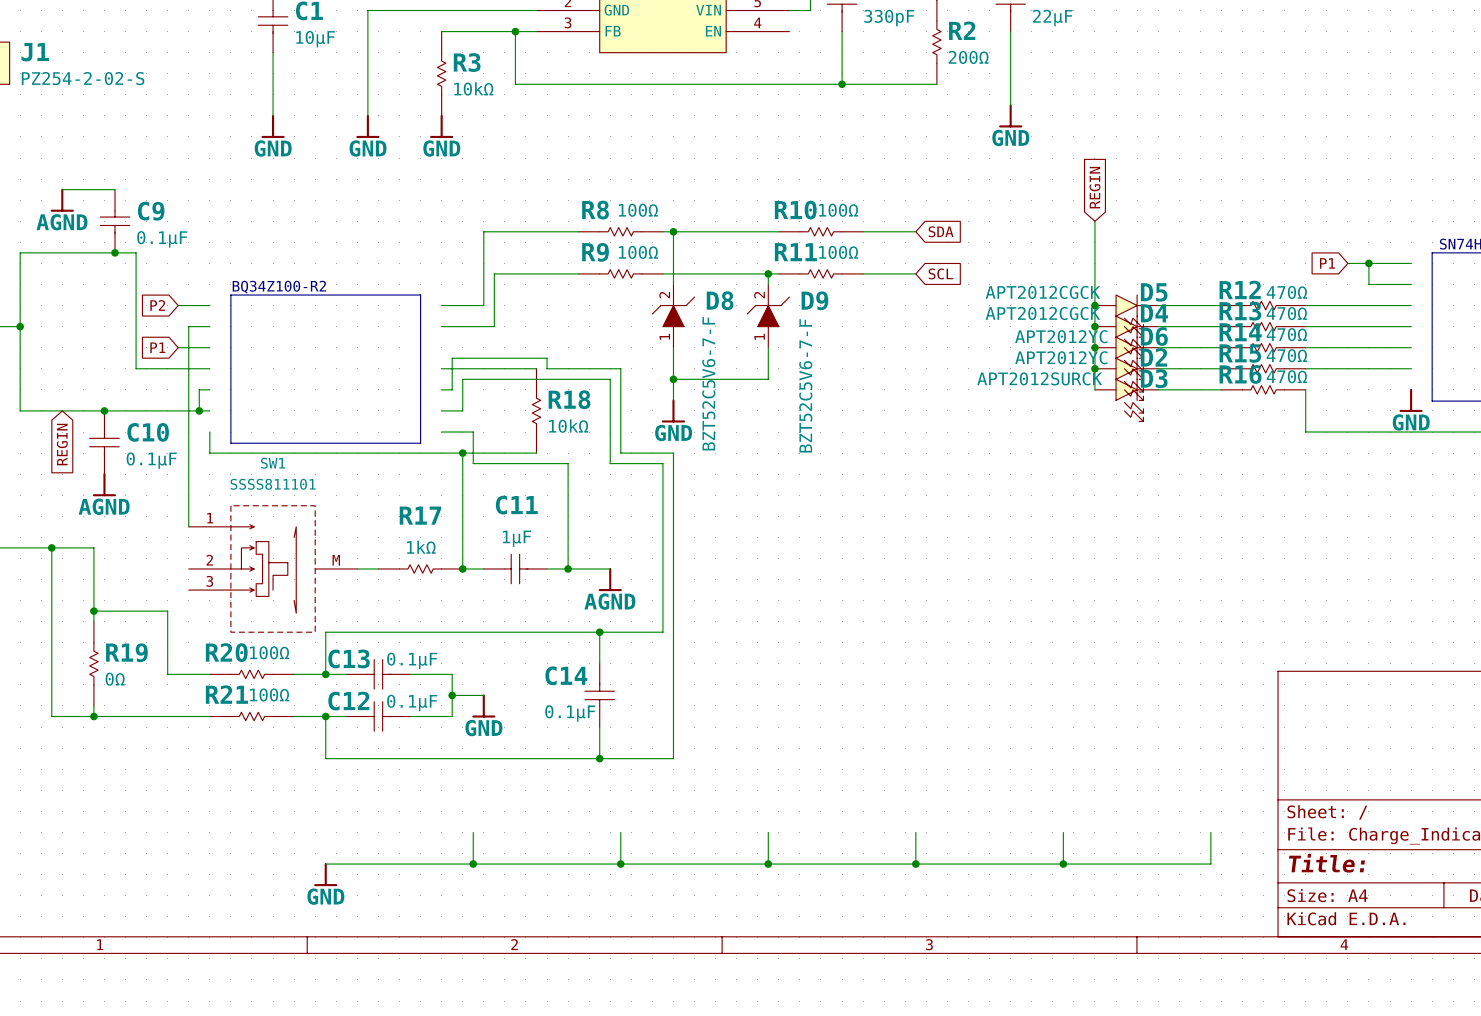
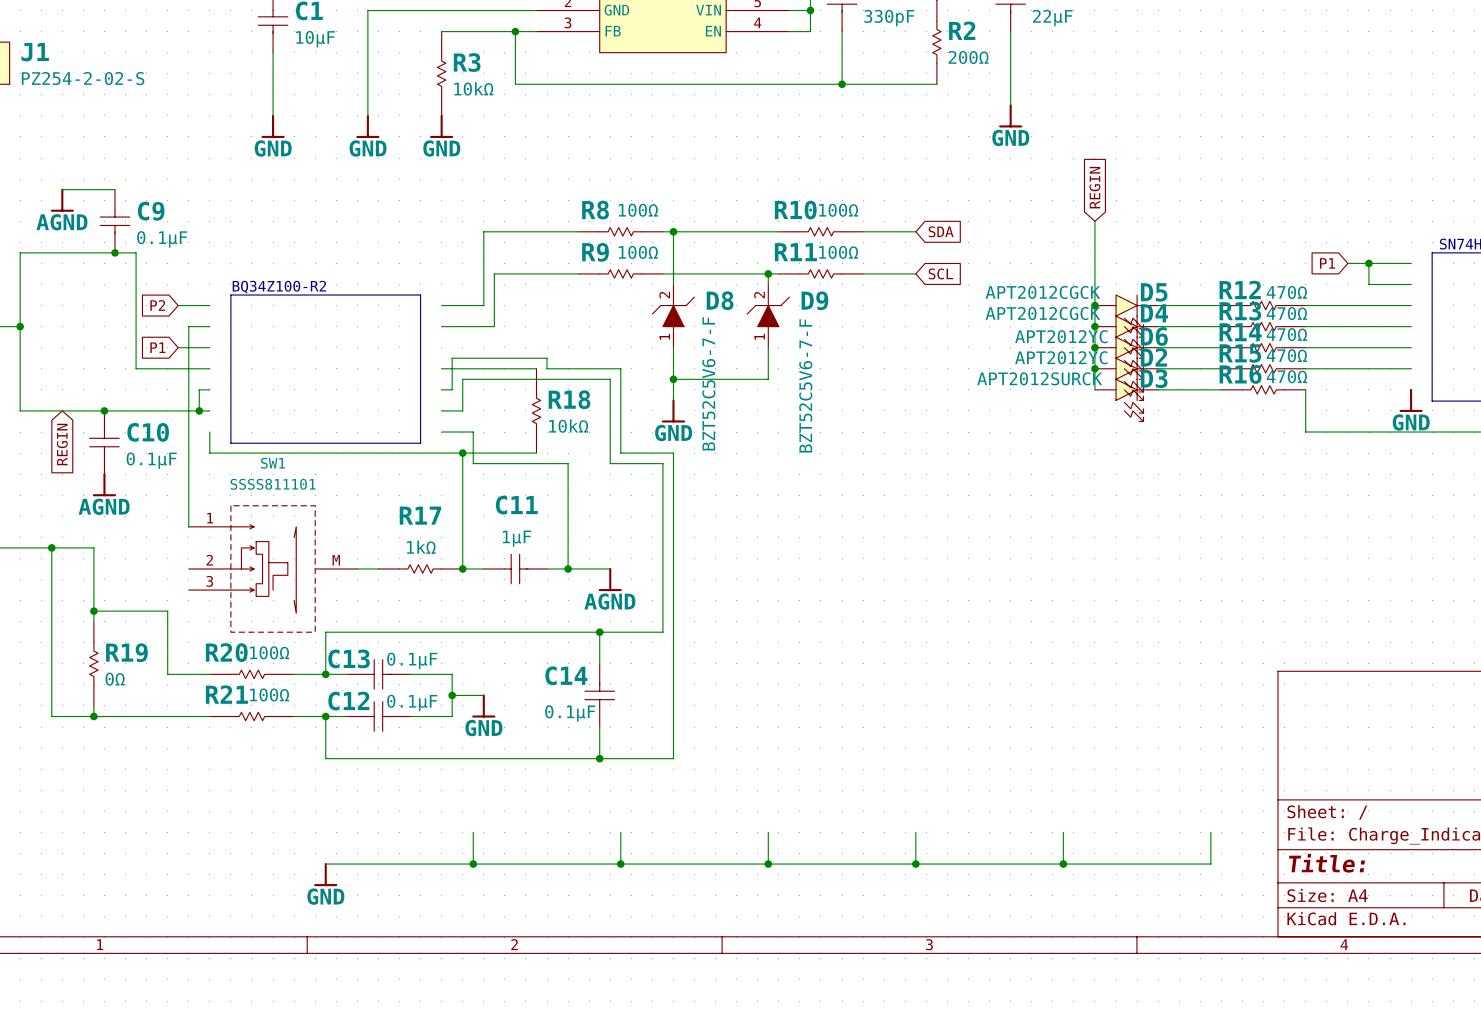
wire: none -> (810, 10) (810, 31) (789, 31)
junction: none -> (810, 10)

